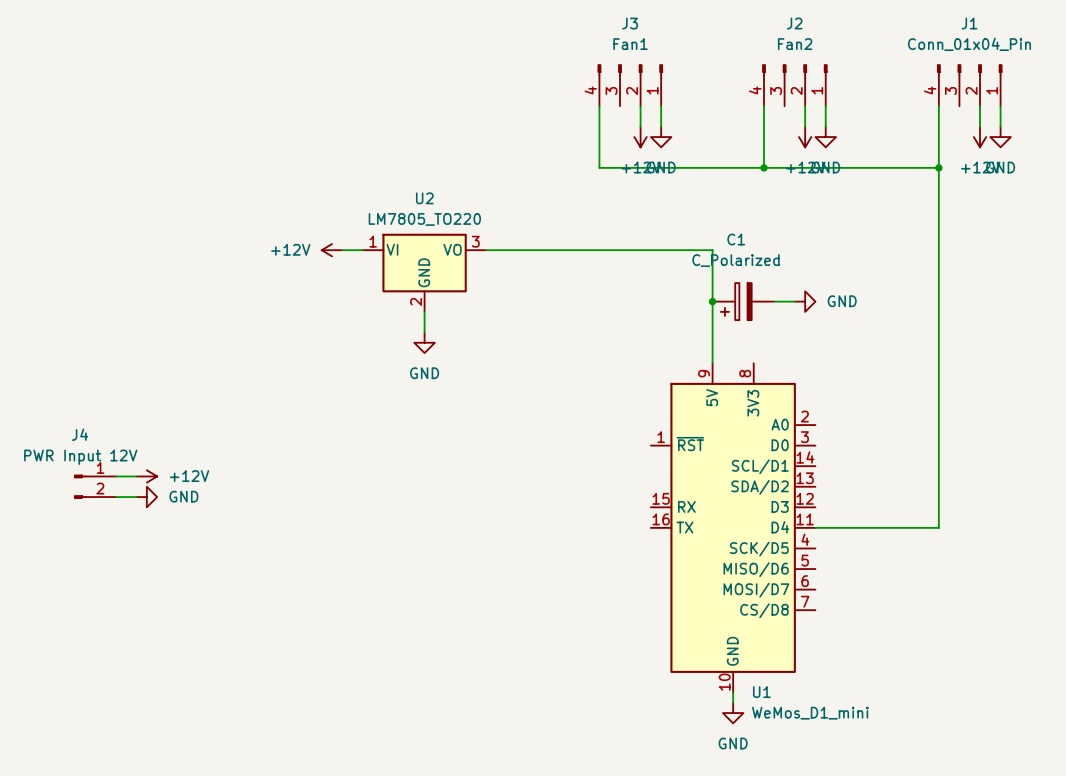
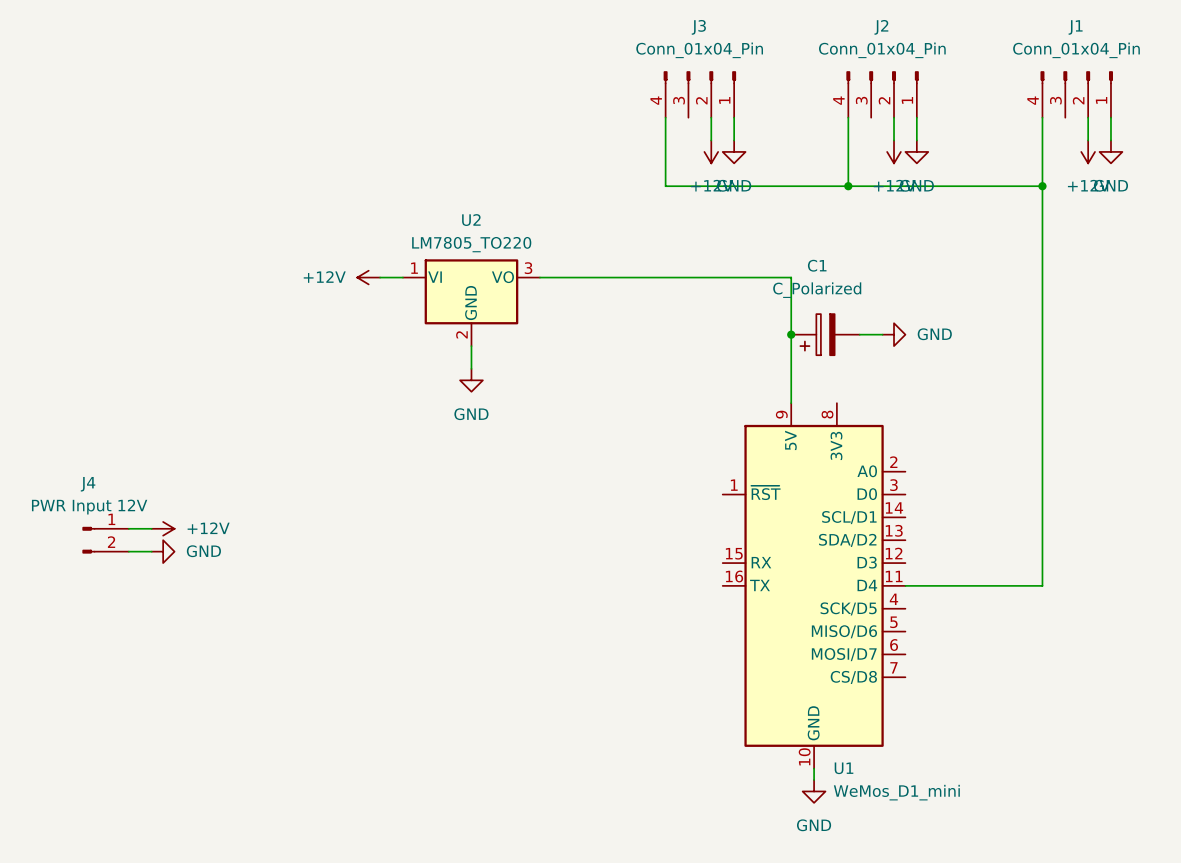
J3 value: Fan1 (630, 44) -> Conn_01x04_Pin (699, 50)
J2 value: Fan2 (795, 44) -> Conn_01x04_Pin (882, 50)

